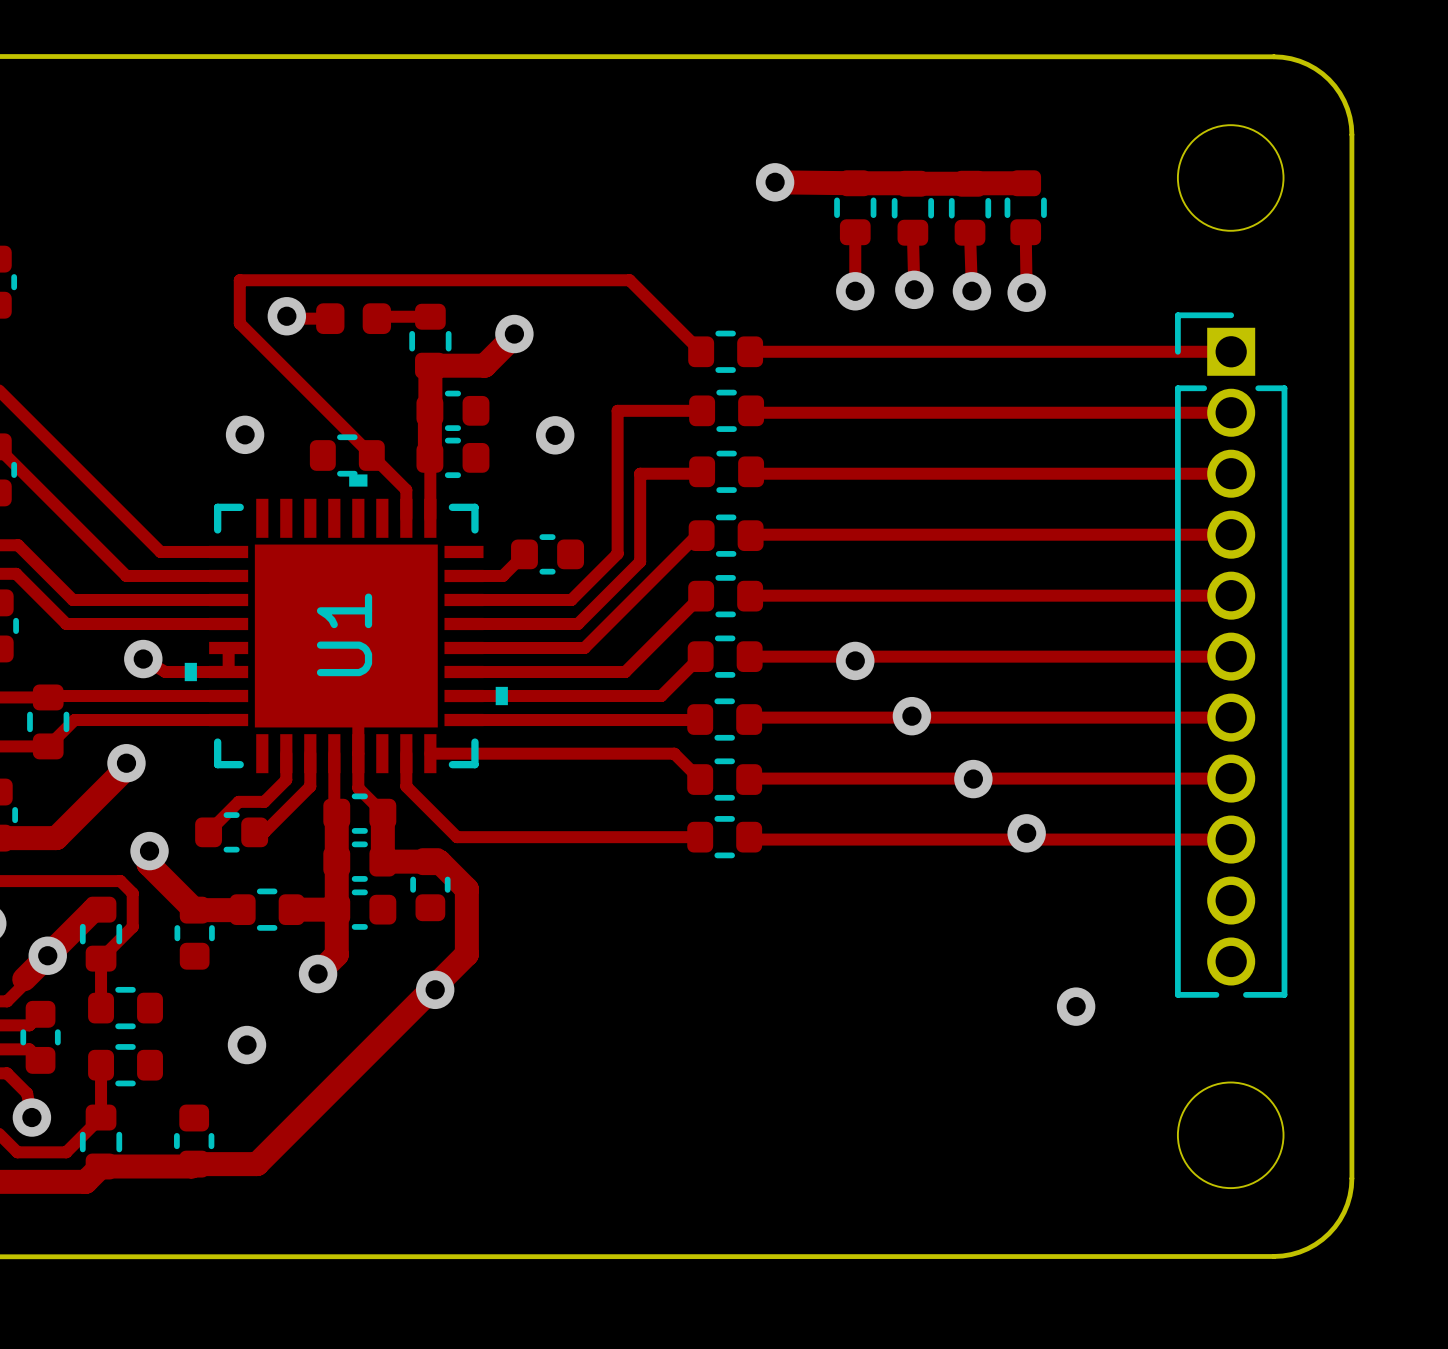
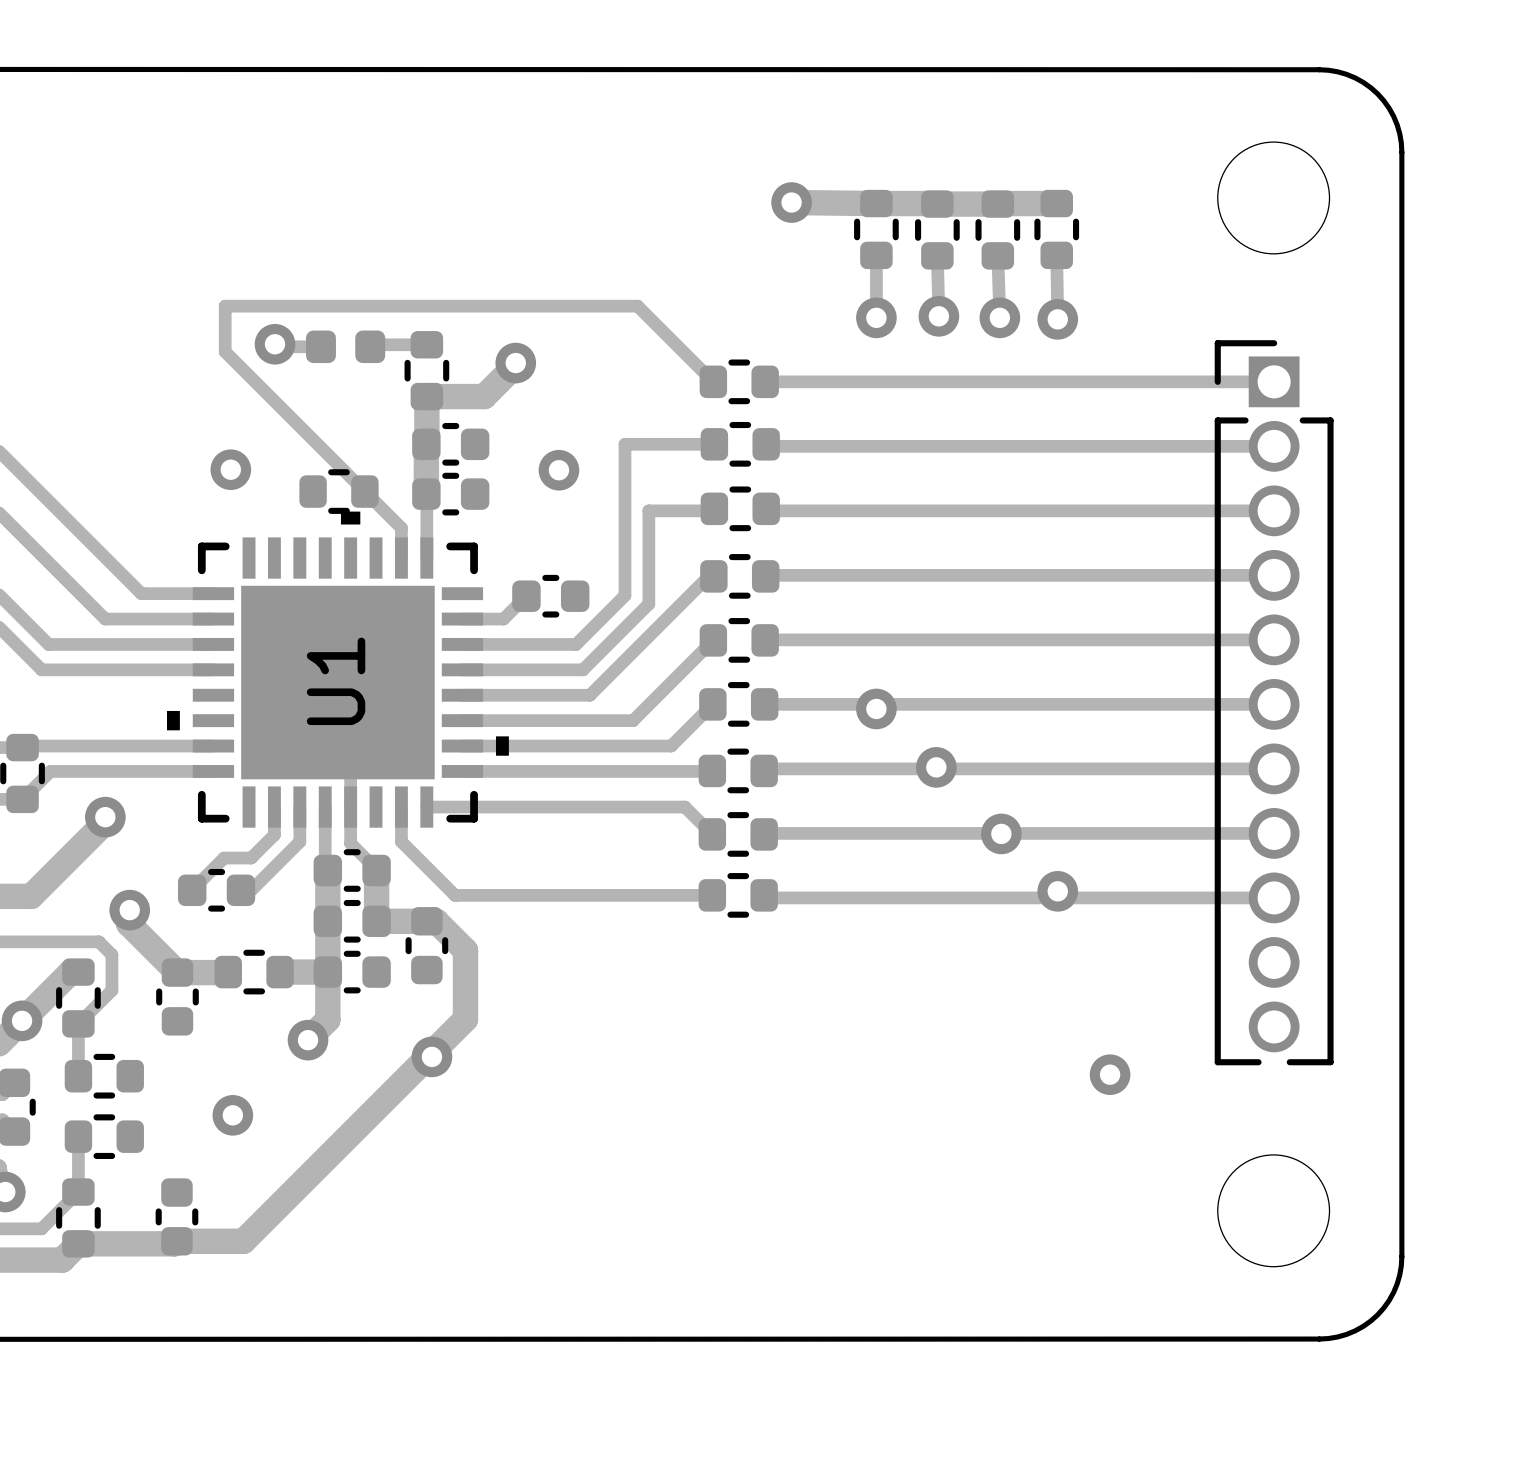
track: (228, 648) (228, 672) (165, 672) (143, 659) (152, 659) -> none
via: (143, 659) -> none

